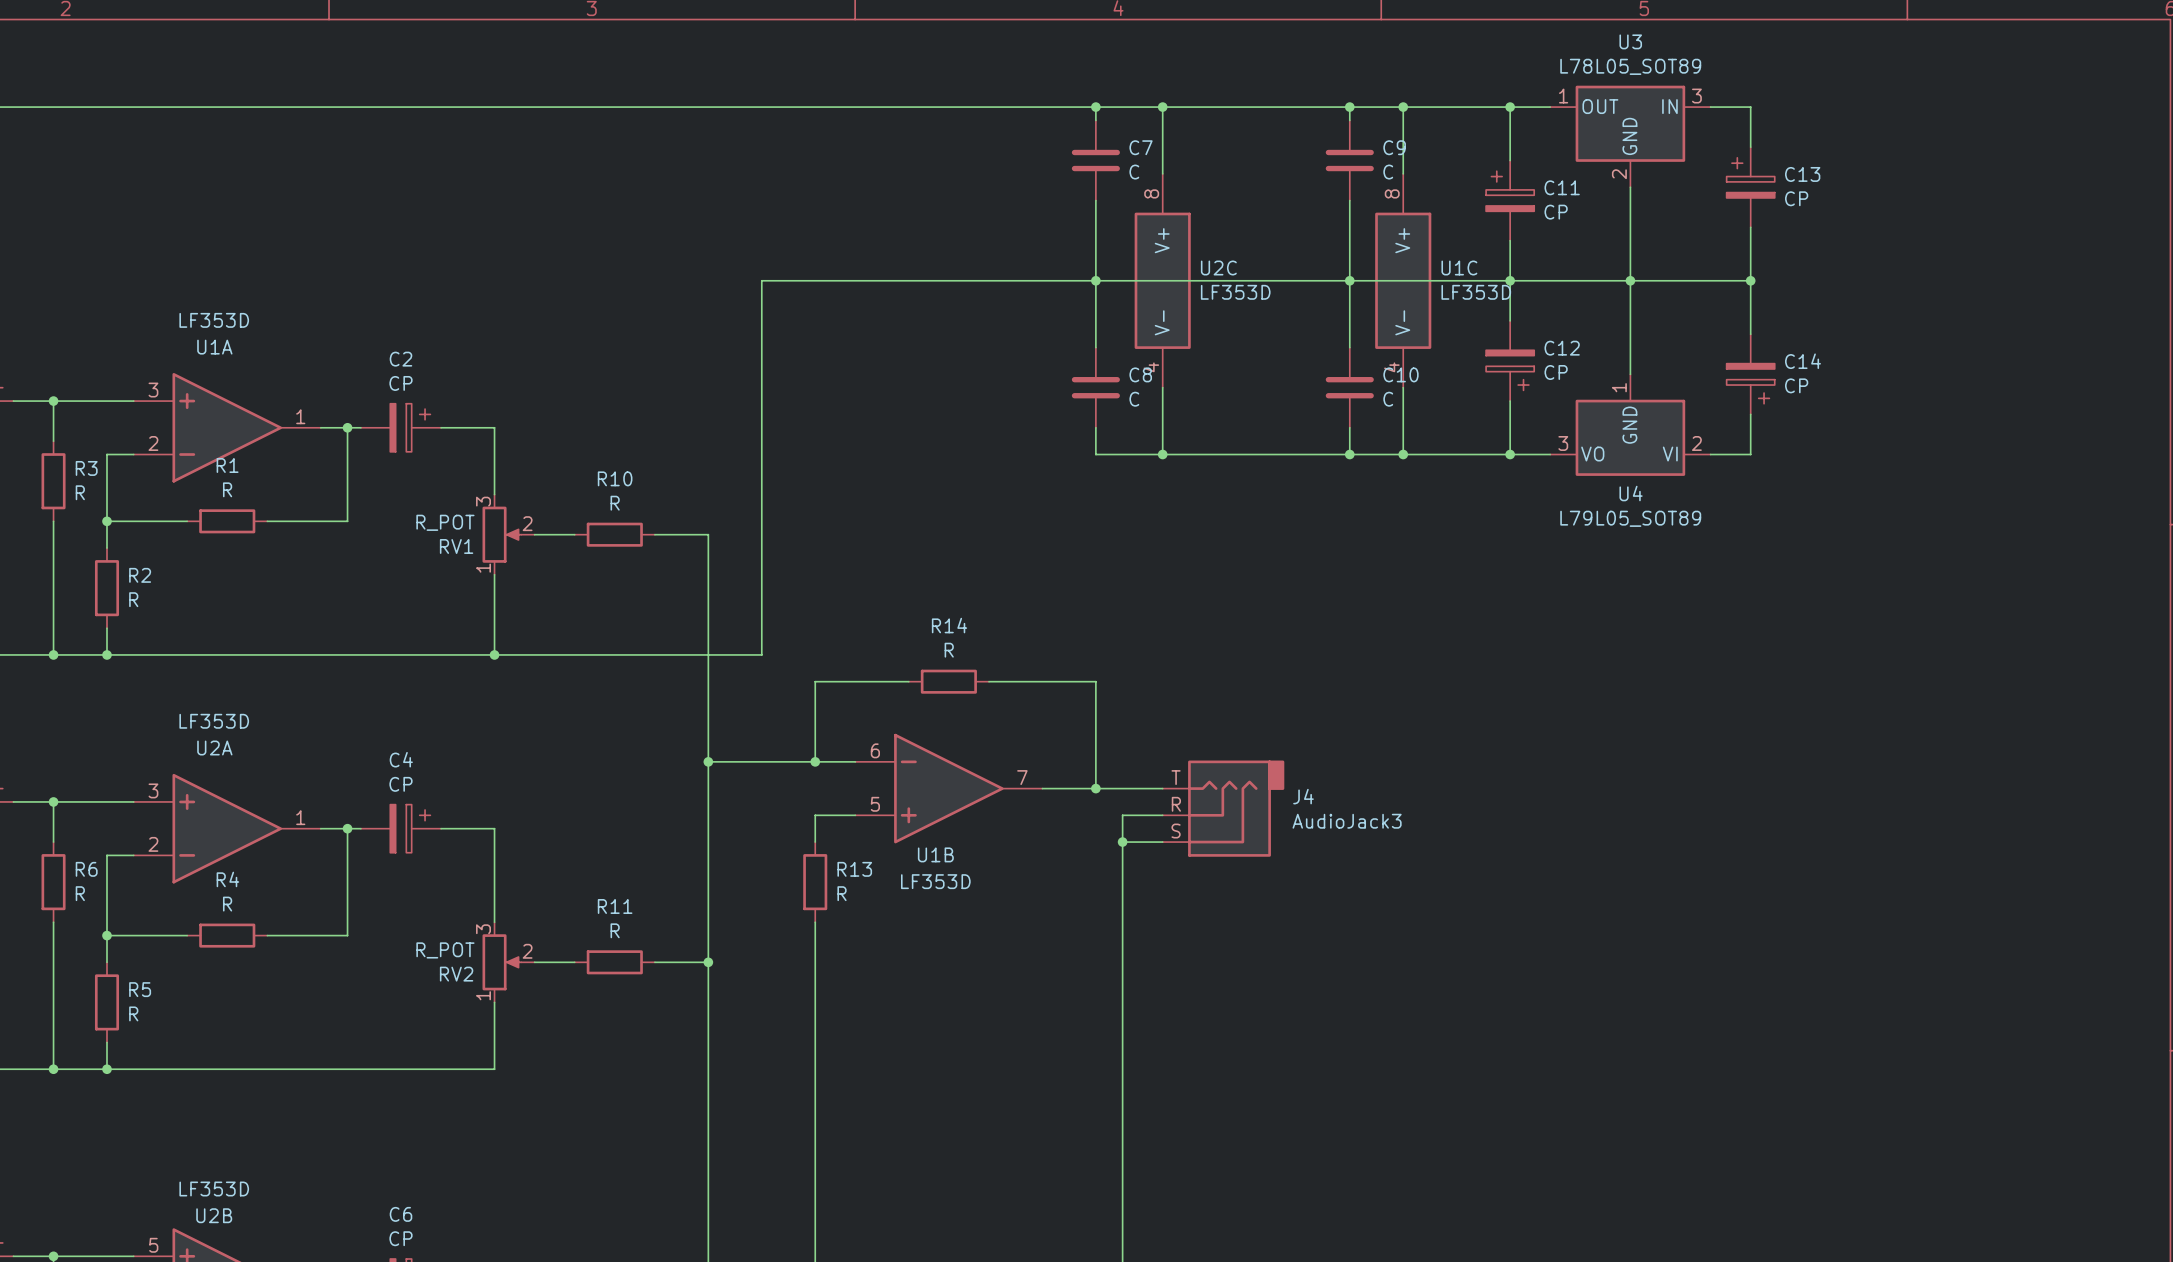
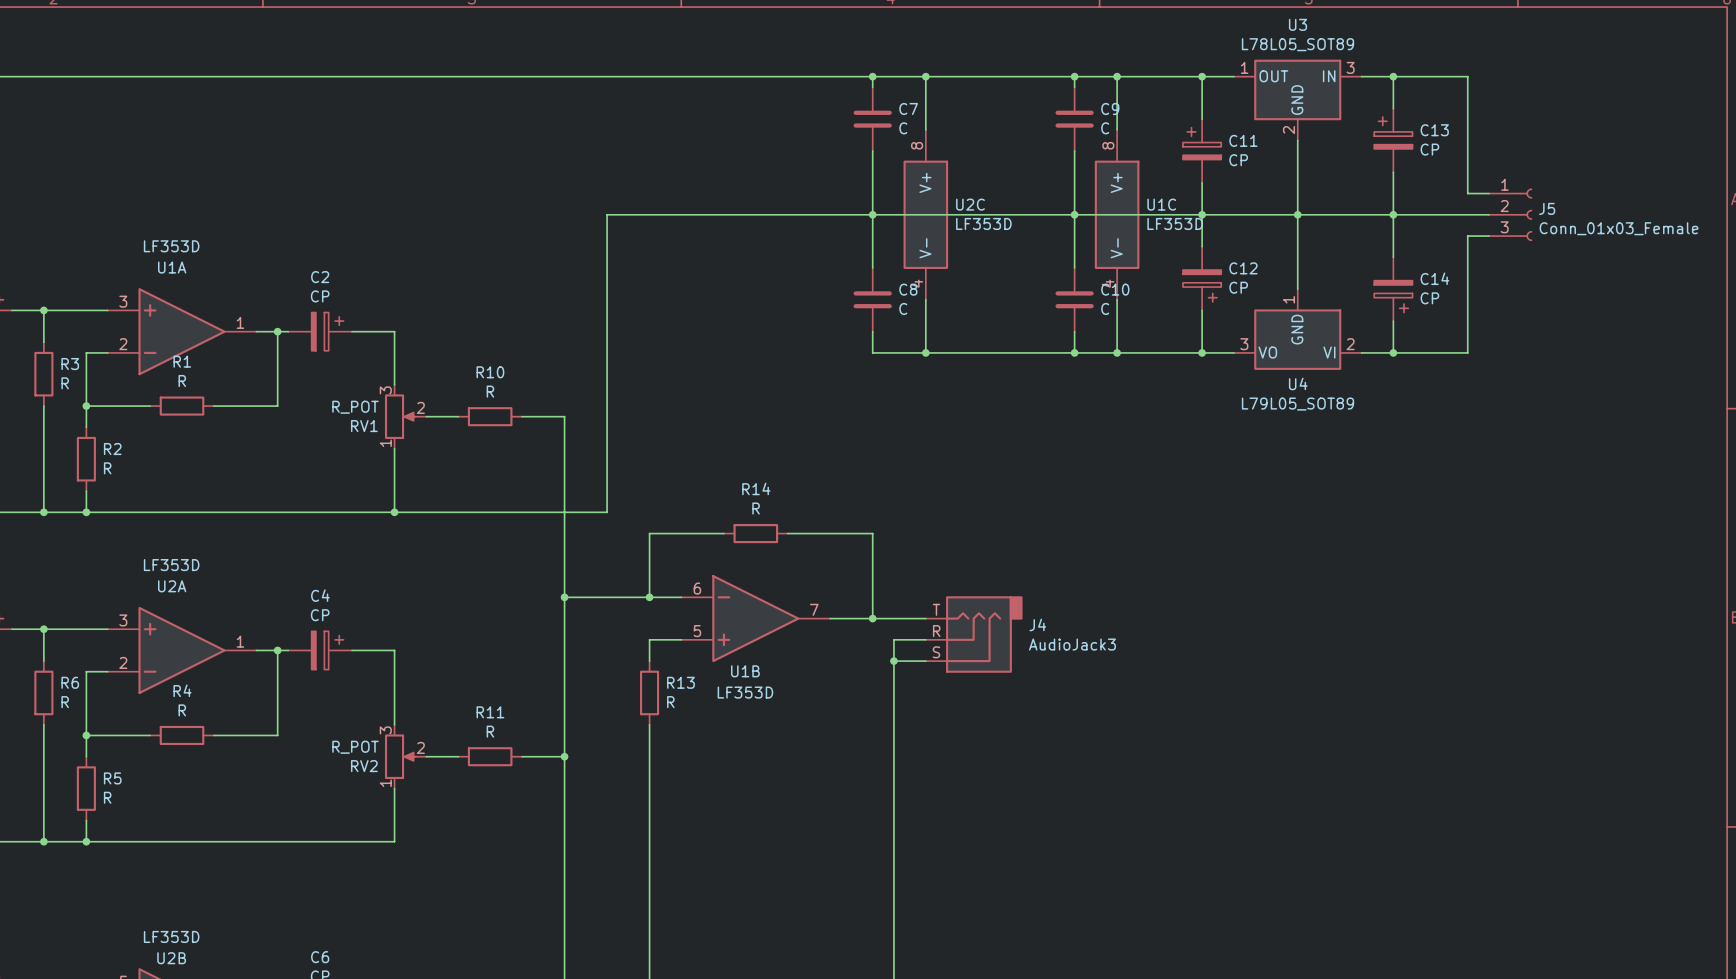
wire: none -> (1393, 76) (1467, 76) (1467, 193) (1489, 193)
junction: none -> (1393, 76)
wire: none -> (1393, 214) (1489, 214)
J5: none -> Conn_01x03_Female (1510, 214)
wire: none -> (1489, 236) (1467, 236) (1467, 352) (1393, 352)
junction: none -> (1393, 352)

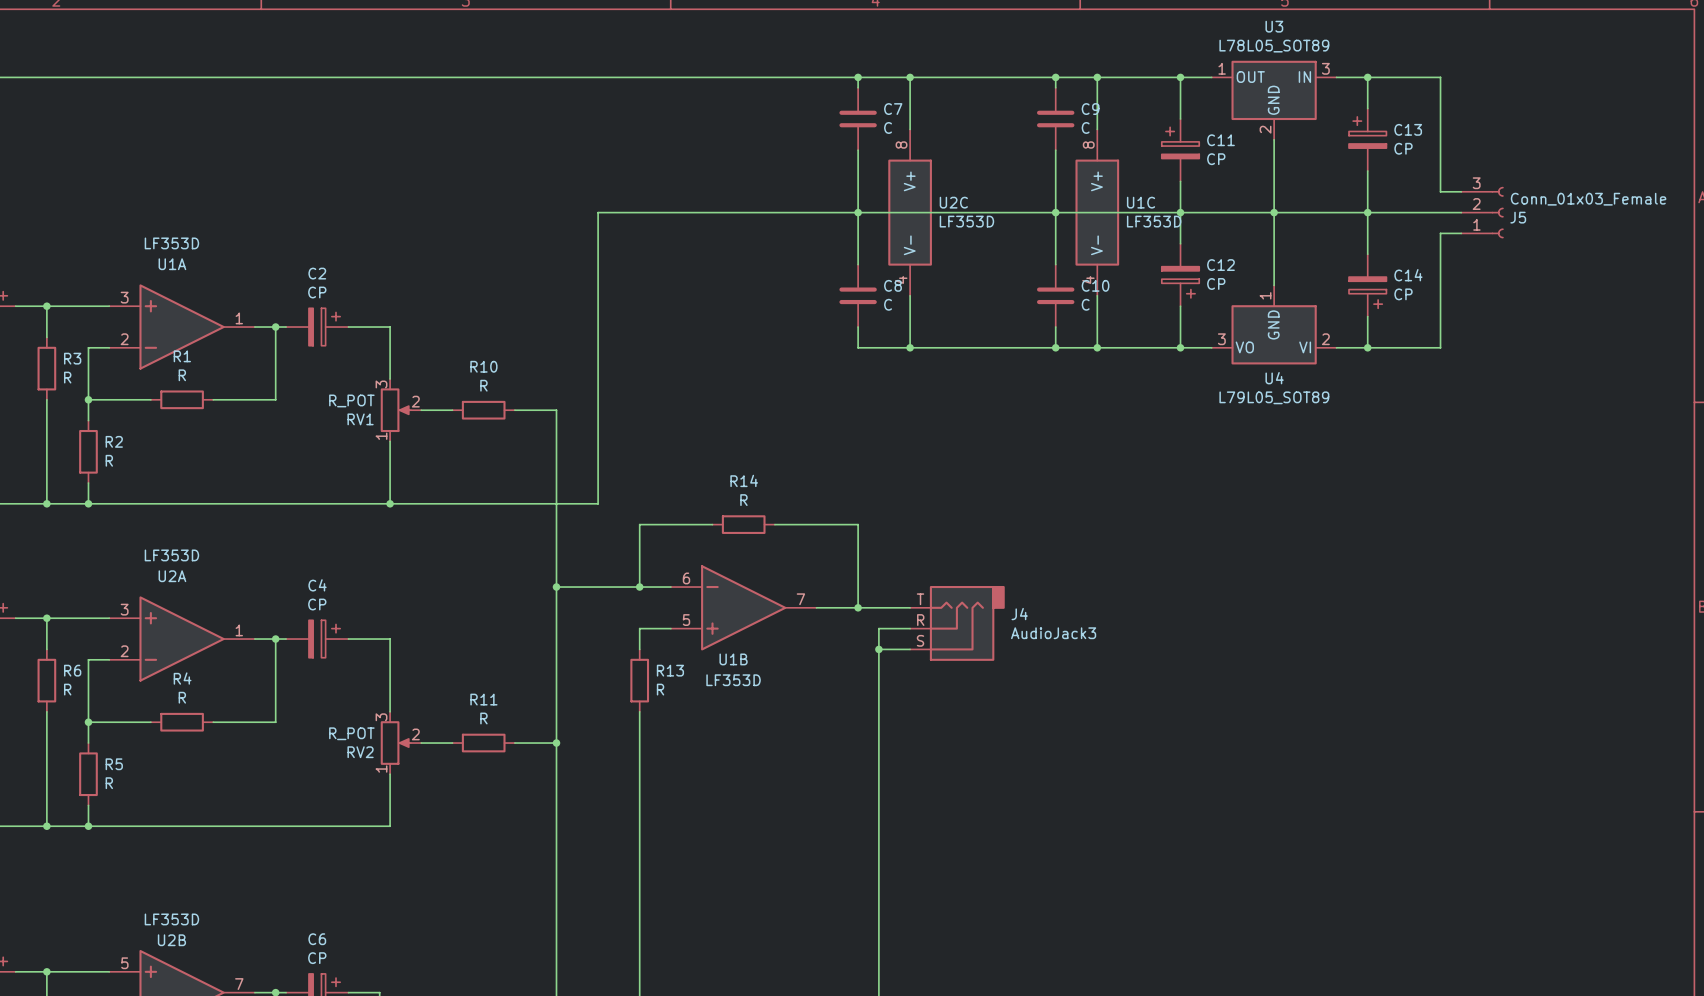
J5 flip: as is (1526, 214) -> up-down (1497, 212)

